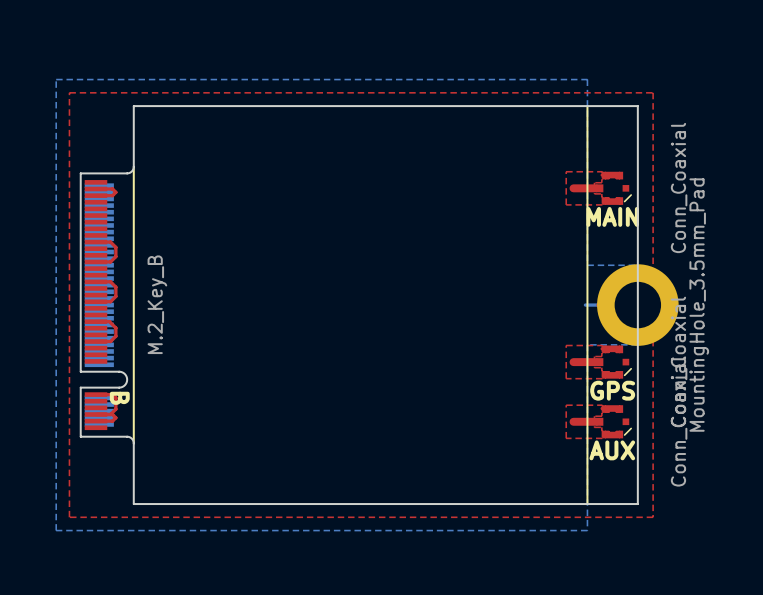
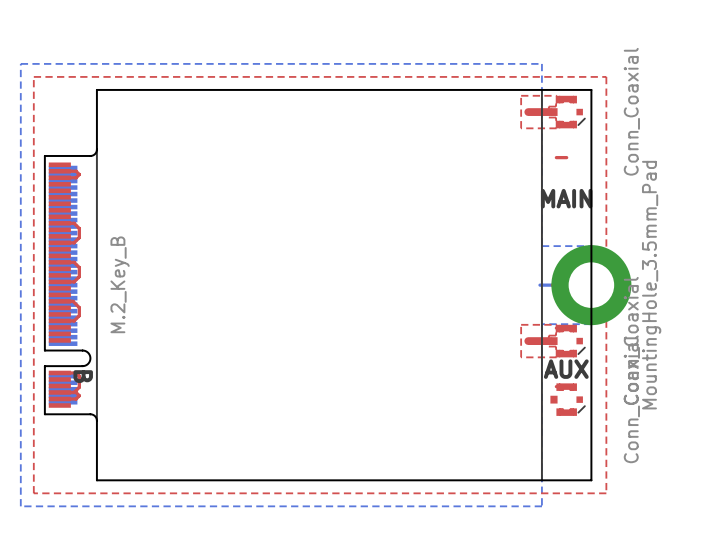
top zone outline: (566, 171) (566, 204) (602, 204) (601, 193) (594, 193) (594, 182) (601, 182) (602, 171) (566, 171) -> (521, 95) (521, 128) (556, 128) (556, 117) (548, 117) (548, 106) (556, 106) (556, 95) (521, 95)
top track: (573, 188) (599, 188) -> (528, 112) (553, 112)
part position: (614, 188) -> (568, 112)
text: GPS (612, 390) -> AUX (566, 369)
top zone outline: (566, 405) (566, 438) (602, 438) (601, 427) (594, 427) (594, 416) (601, 416) (602, 405) (566, 405) -> none
top track: (573, 421) (599, 421) -> none
text: AUX (612, 450) -> none

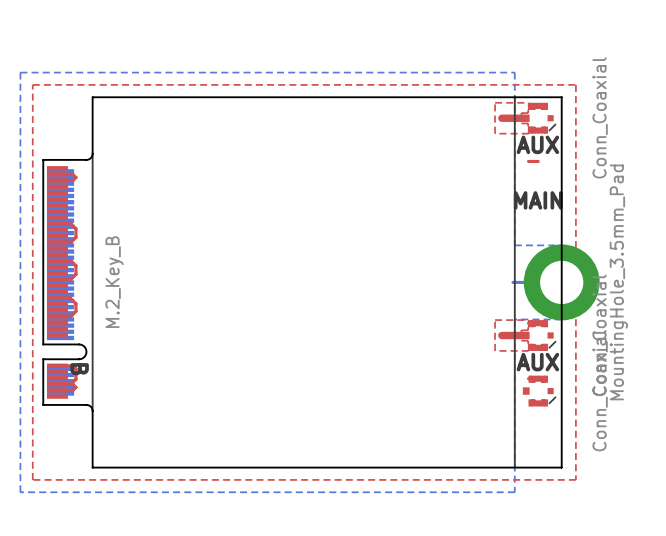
text: none -> AUX (537, 144)

